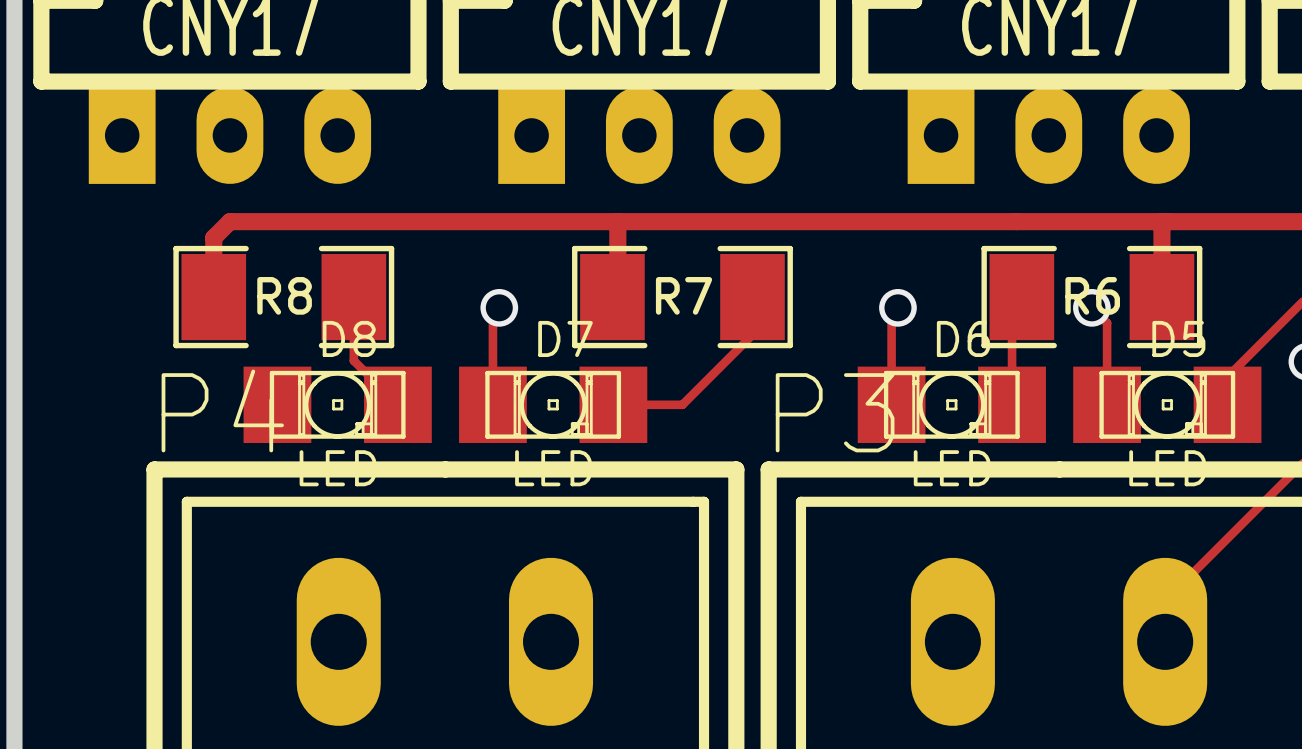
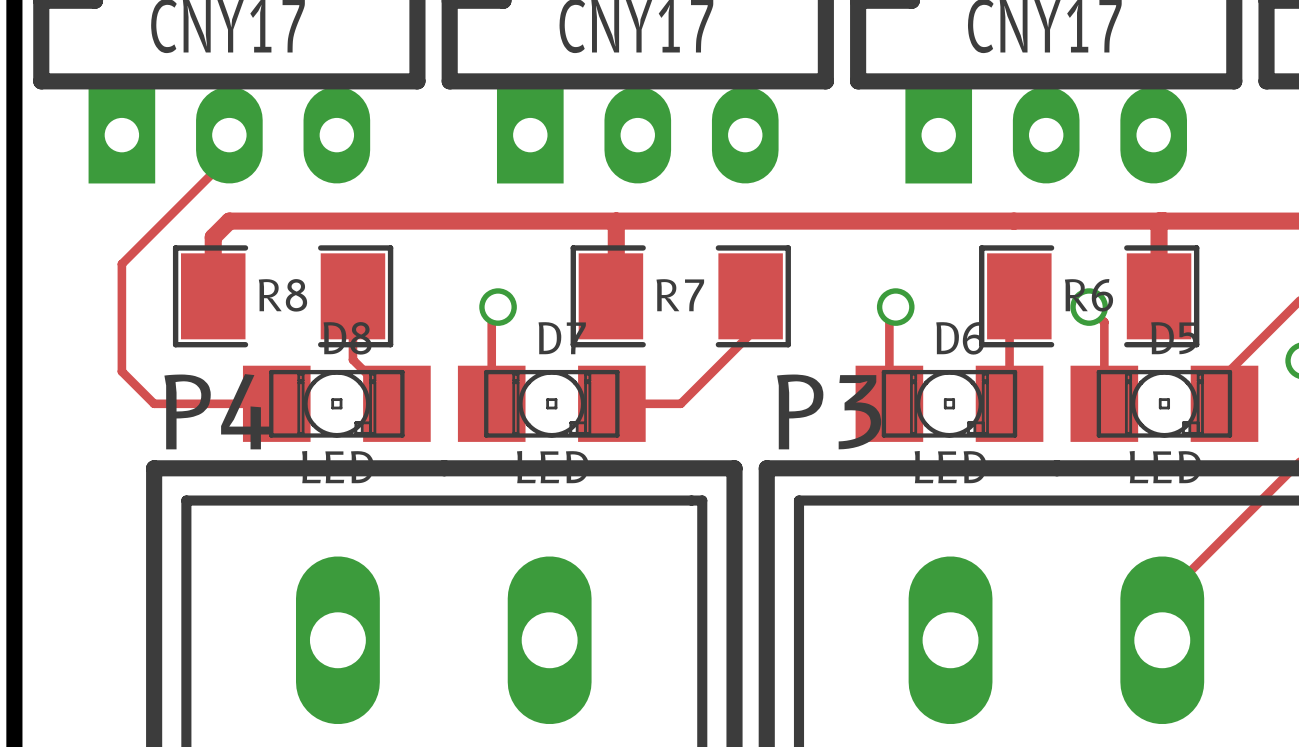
track: none -> (229, 135) (229, 156) (121, 264) (121, 371) (154, 403) (276, 403)

